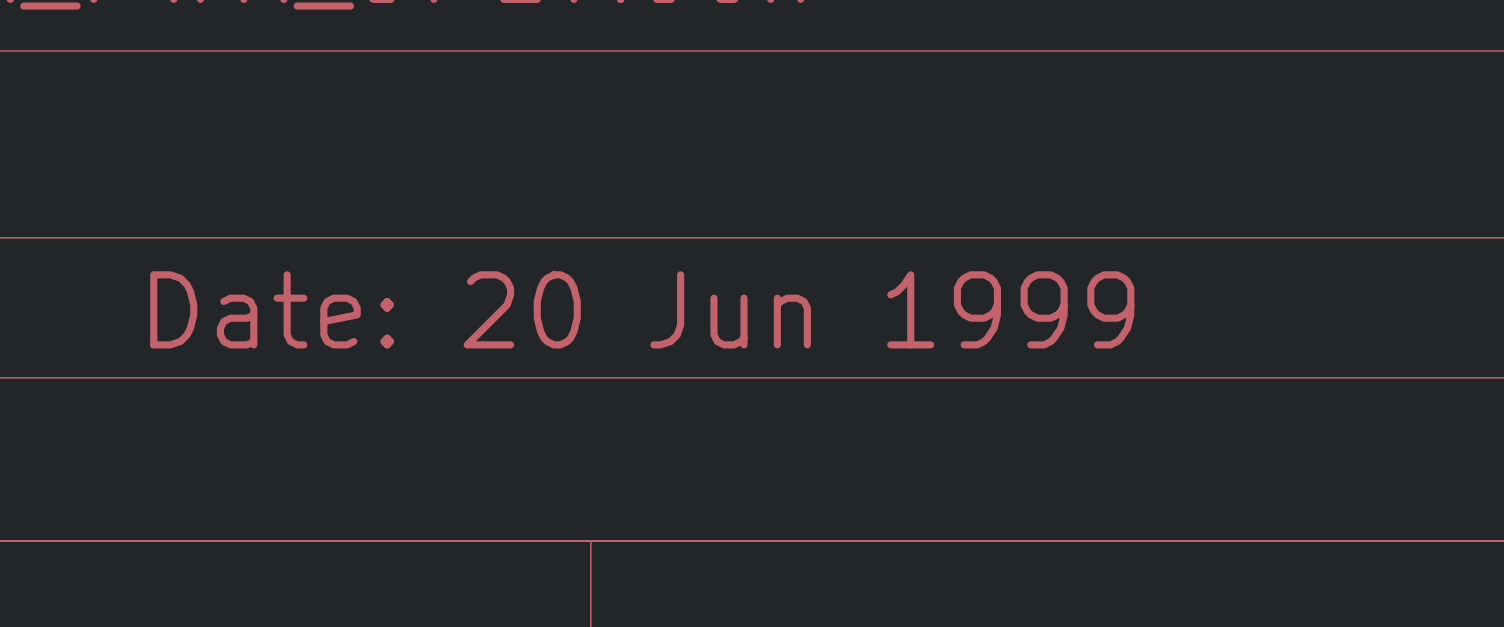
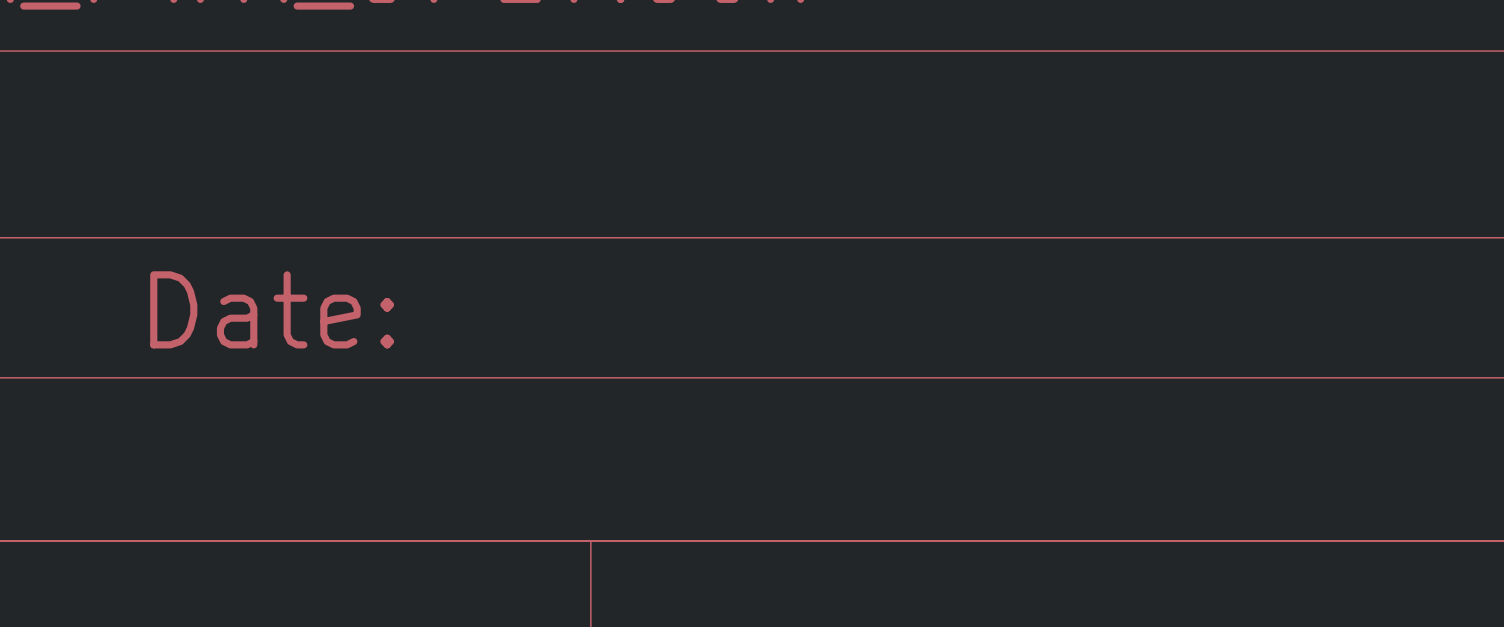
title block: Date: 20 Jun 1999 (642, 309) -> Date: (272, 309)

